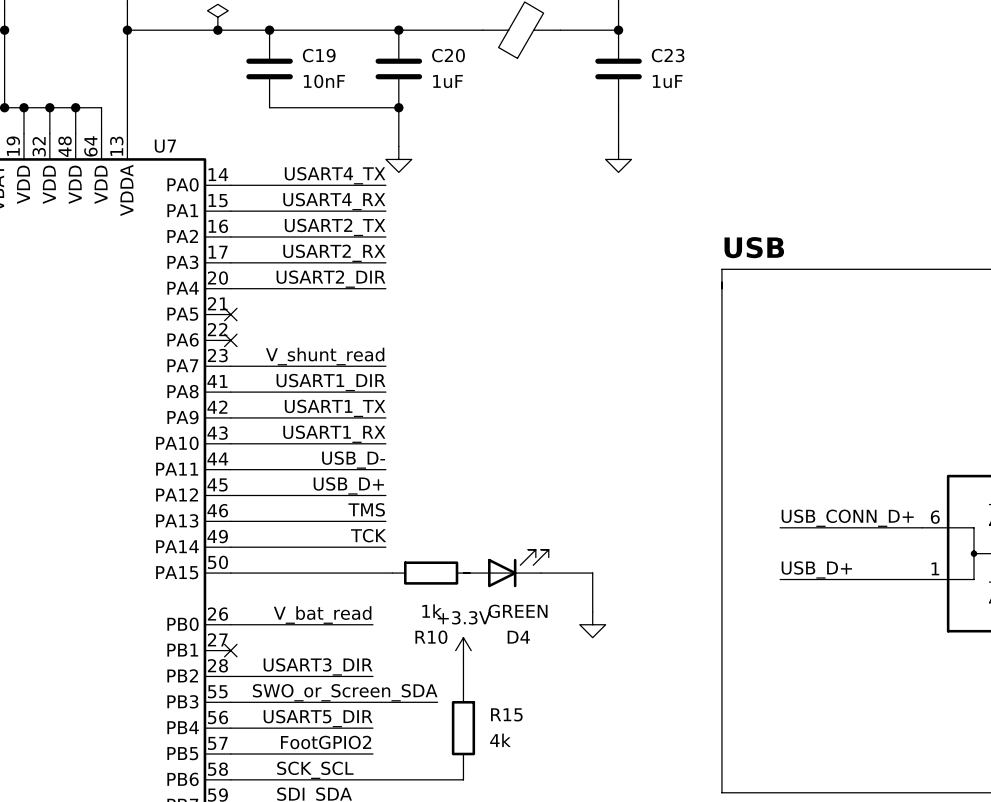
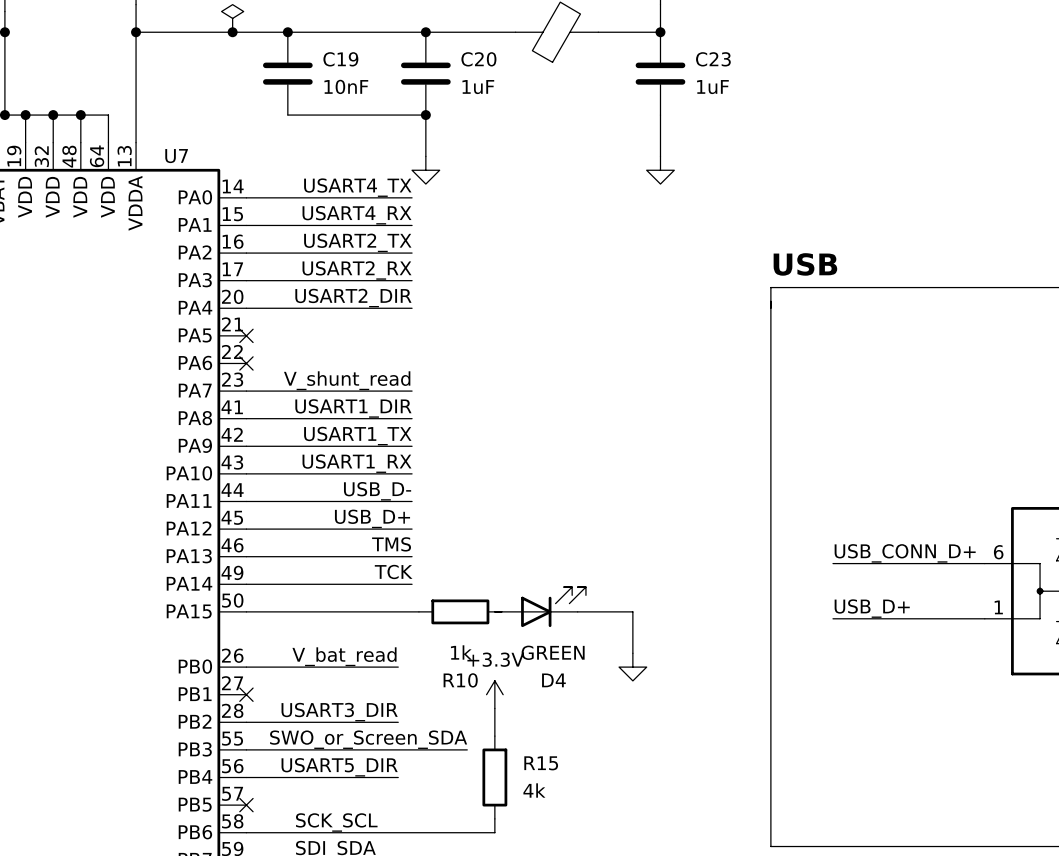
label: FootGPIO2 (326, 742) -> none
wire: (230, 754) (372, 754) -> none
no-connect mark: none -> (246, 805)

